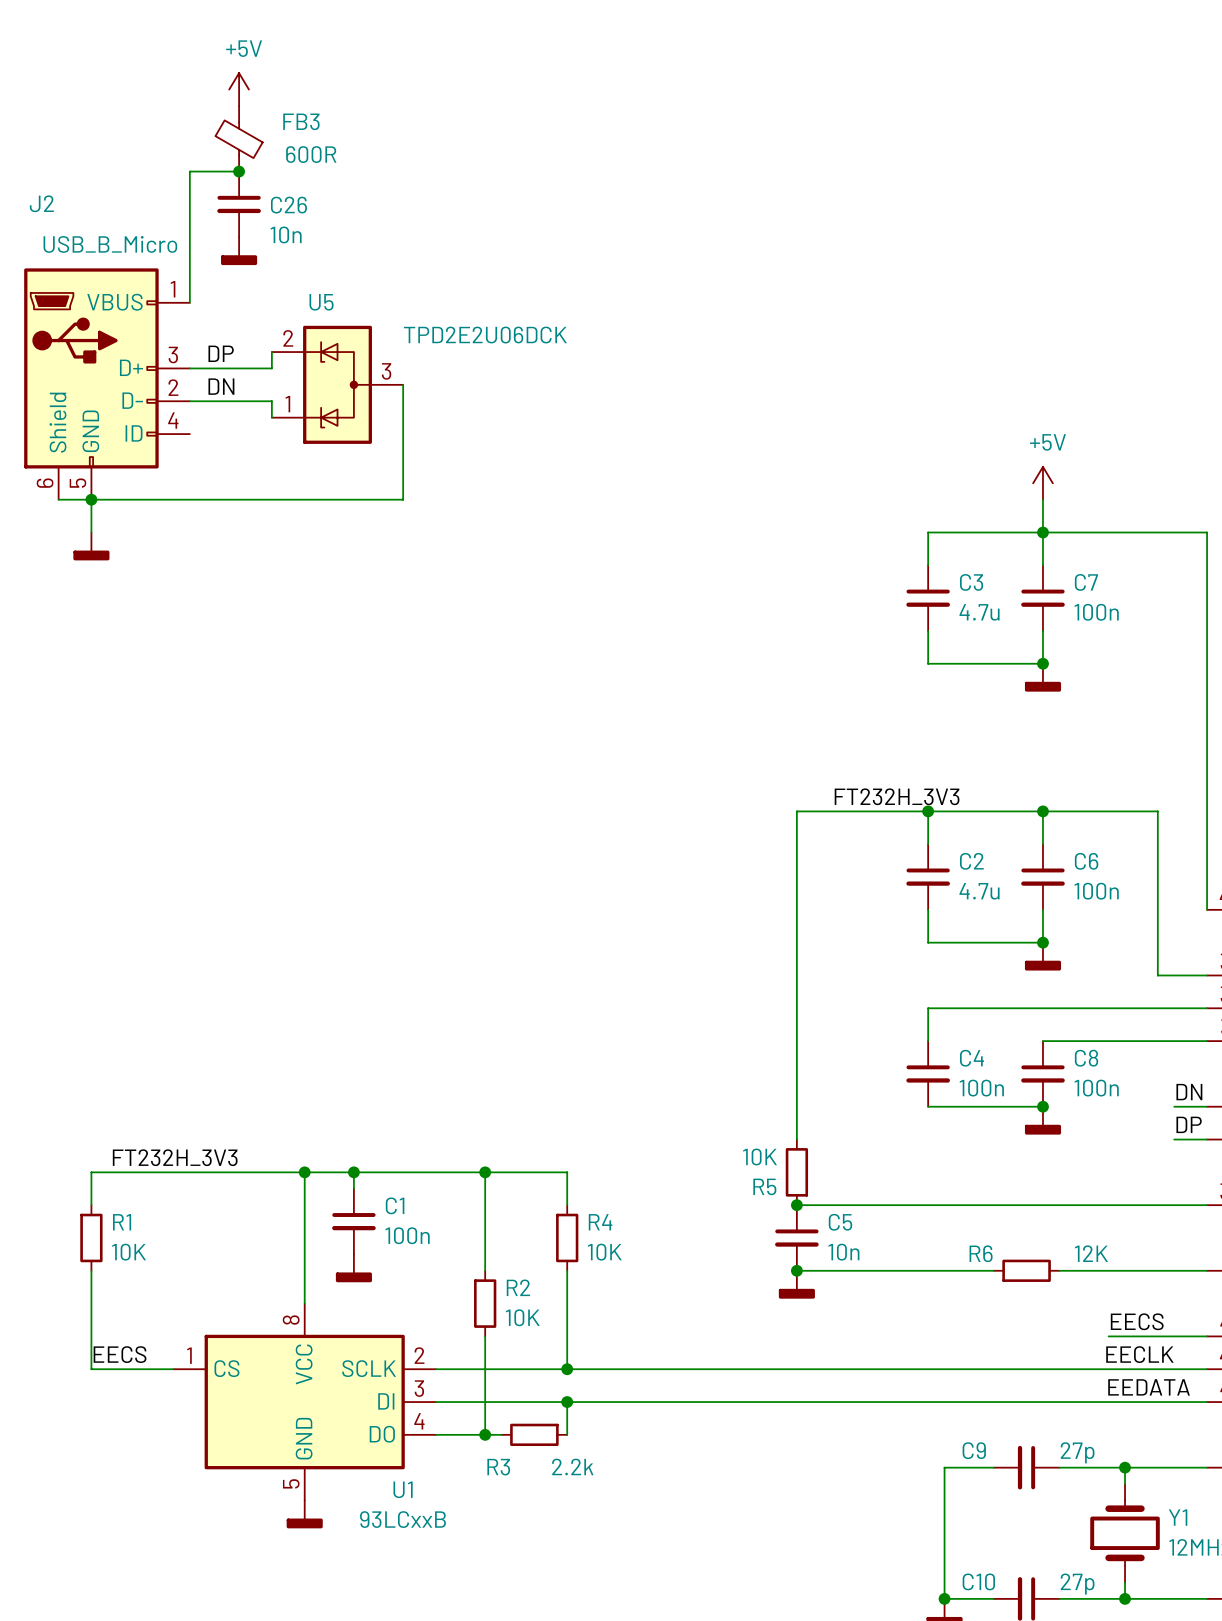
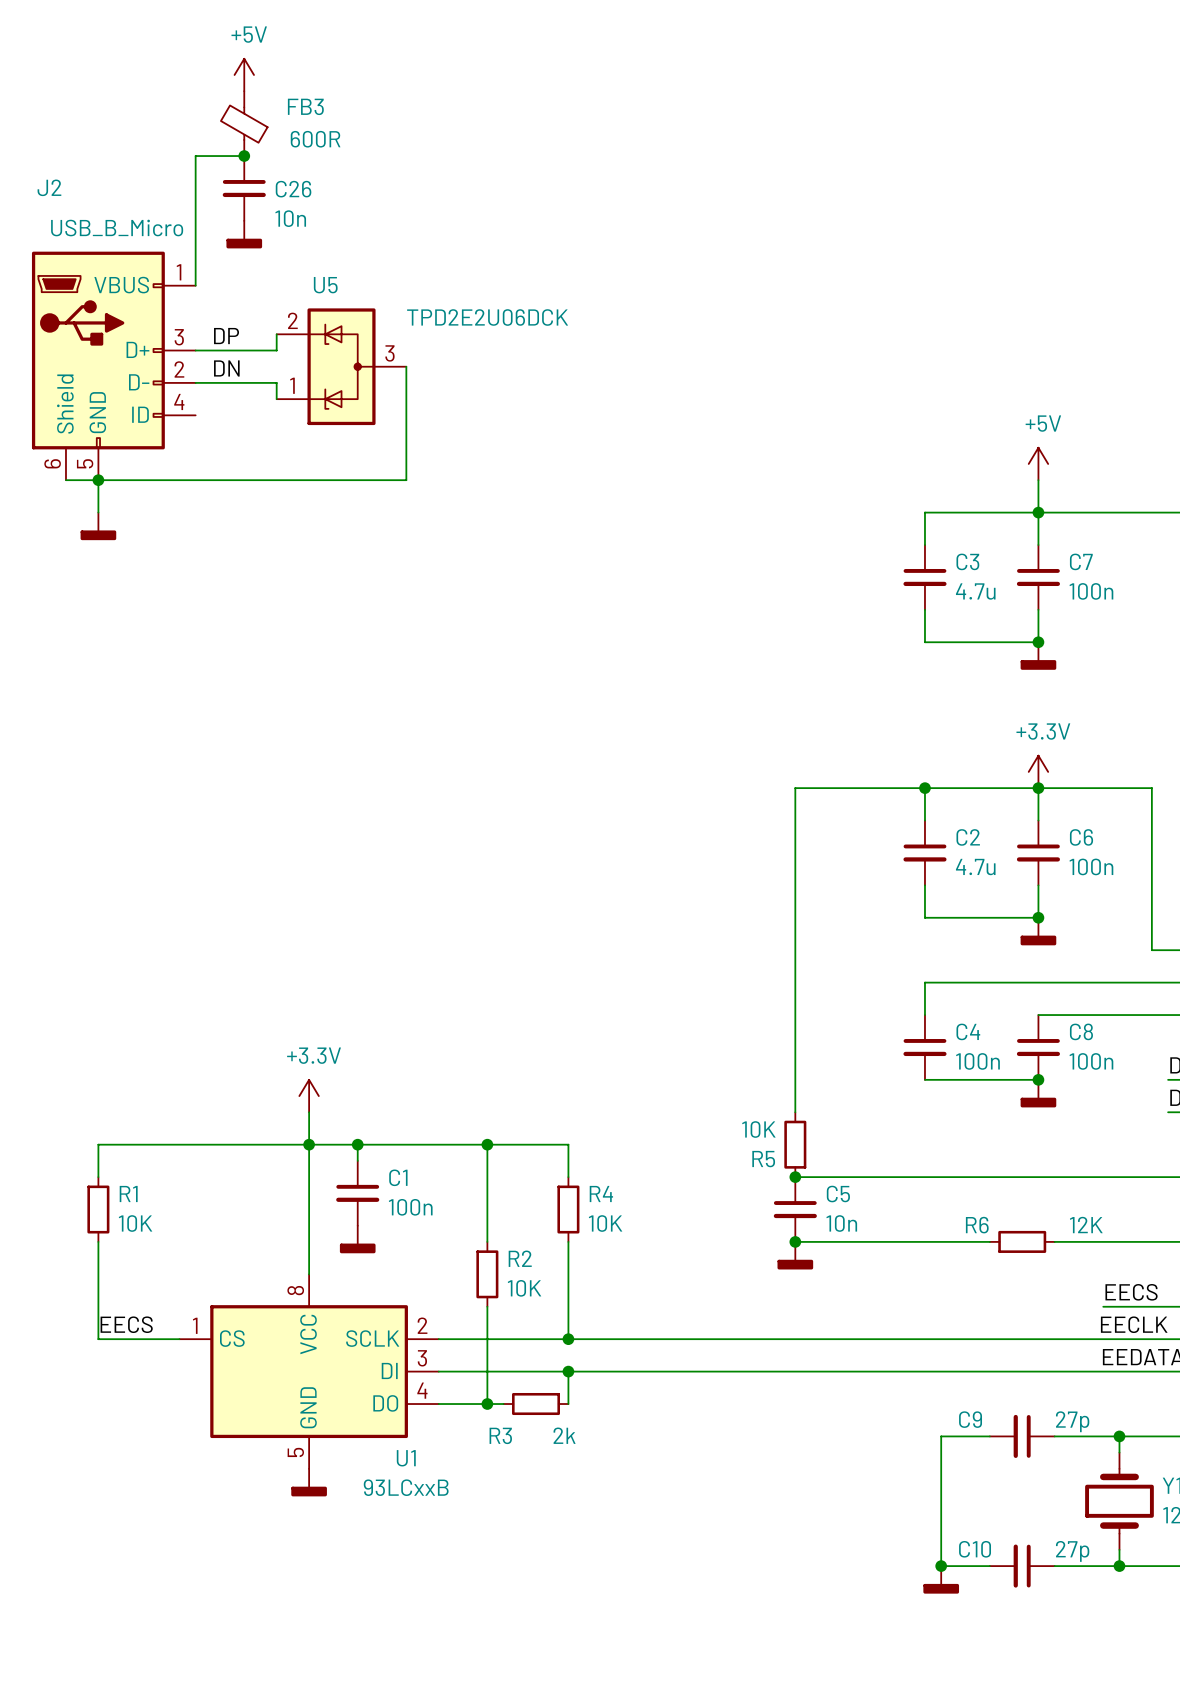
power symbol: none -> +3.3V (1038, 771)
label: FT232H_3V3 (897, 796) -> none
power symbol: none -> +3.3V (309, 1096)
wire: none -> (309, 1112) (309, 1144)
label: FT232H_3V3 (175, 1157) -> none
R3 value: 2.2k (572, 1466) -> 2k (564, 1435)

